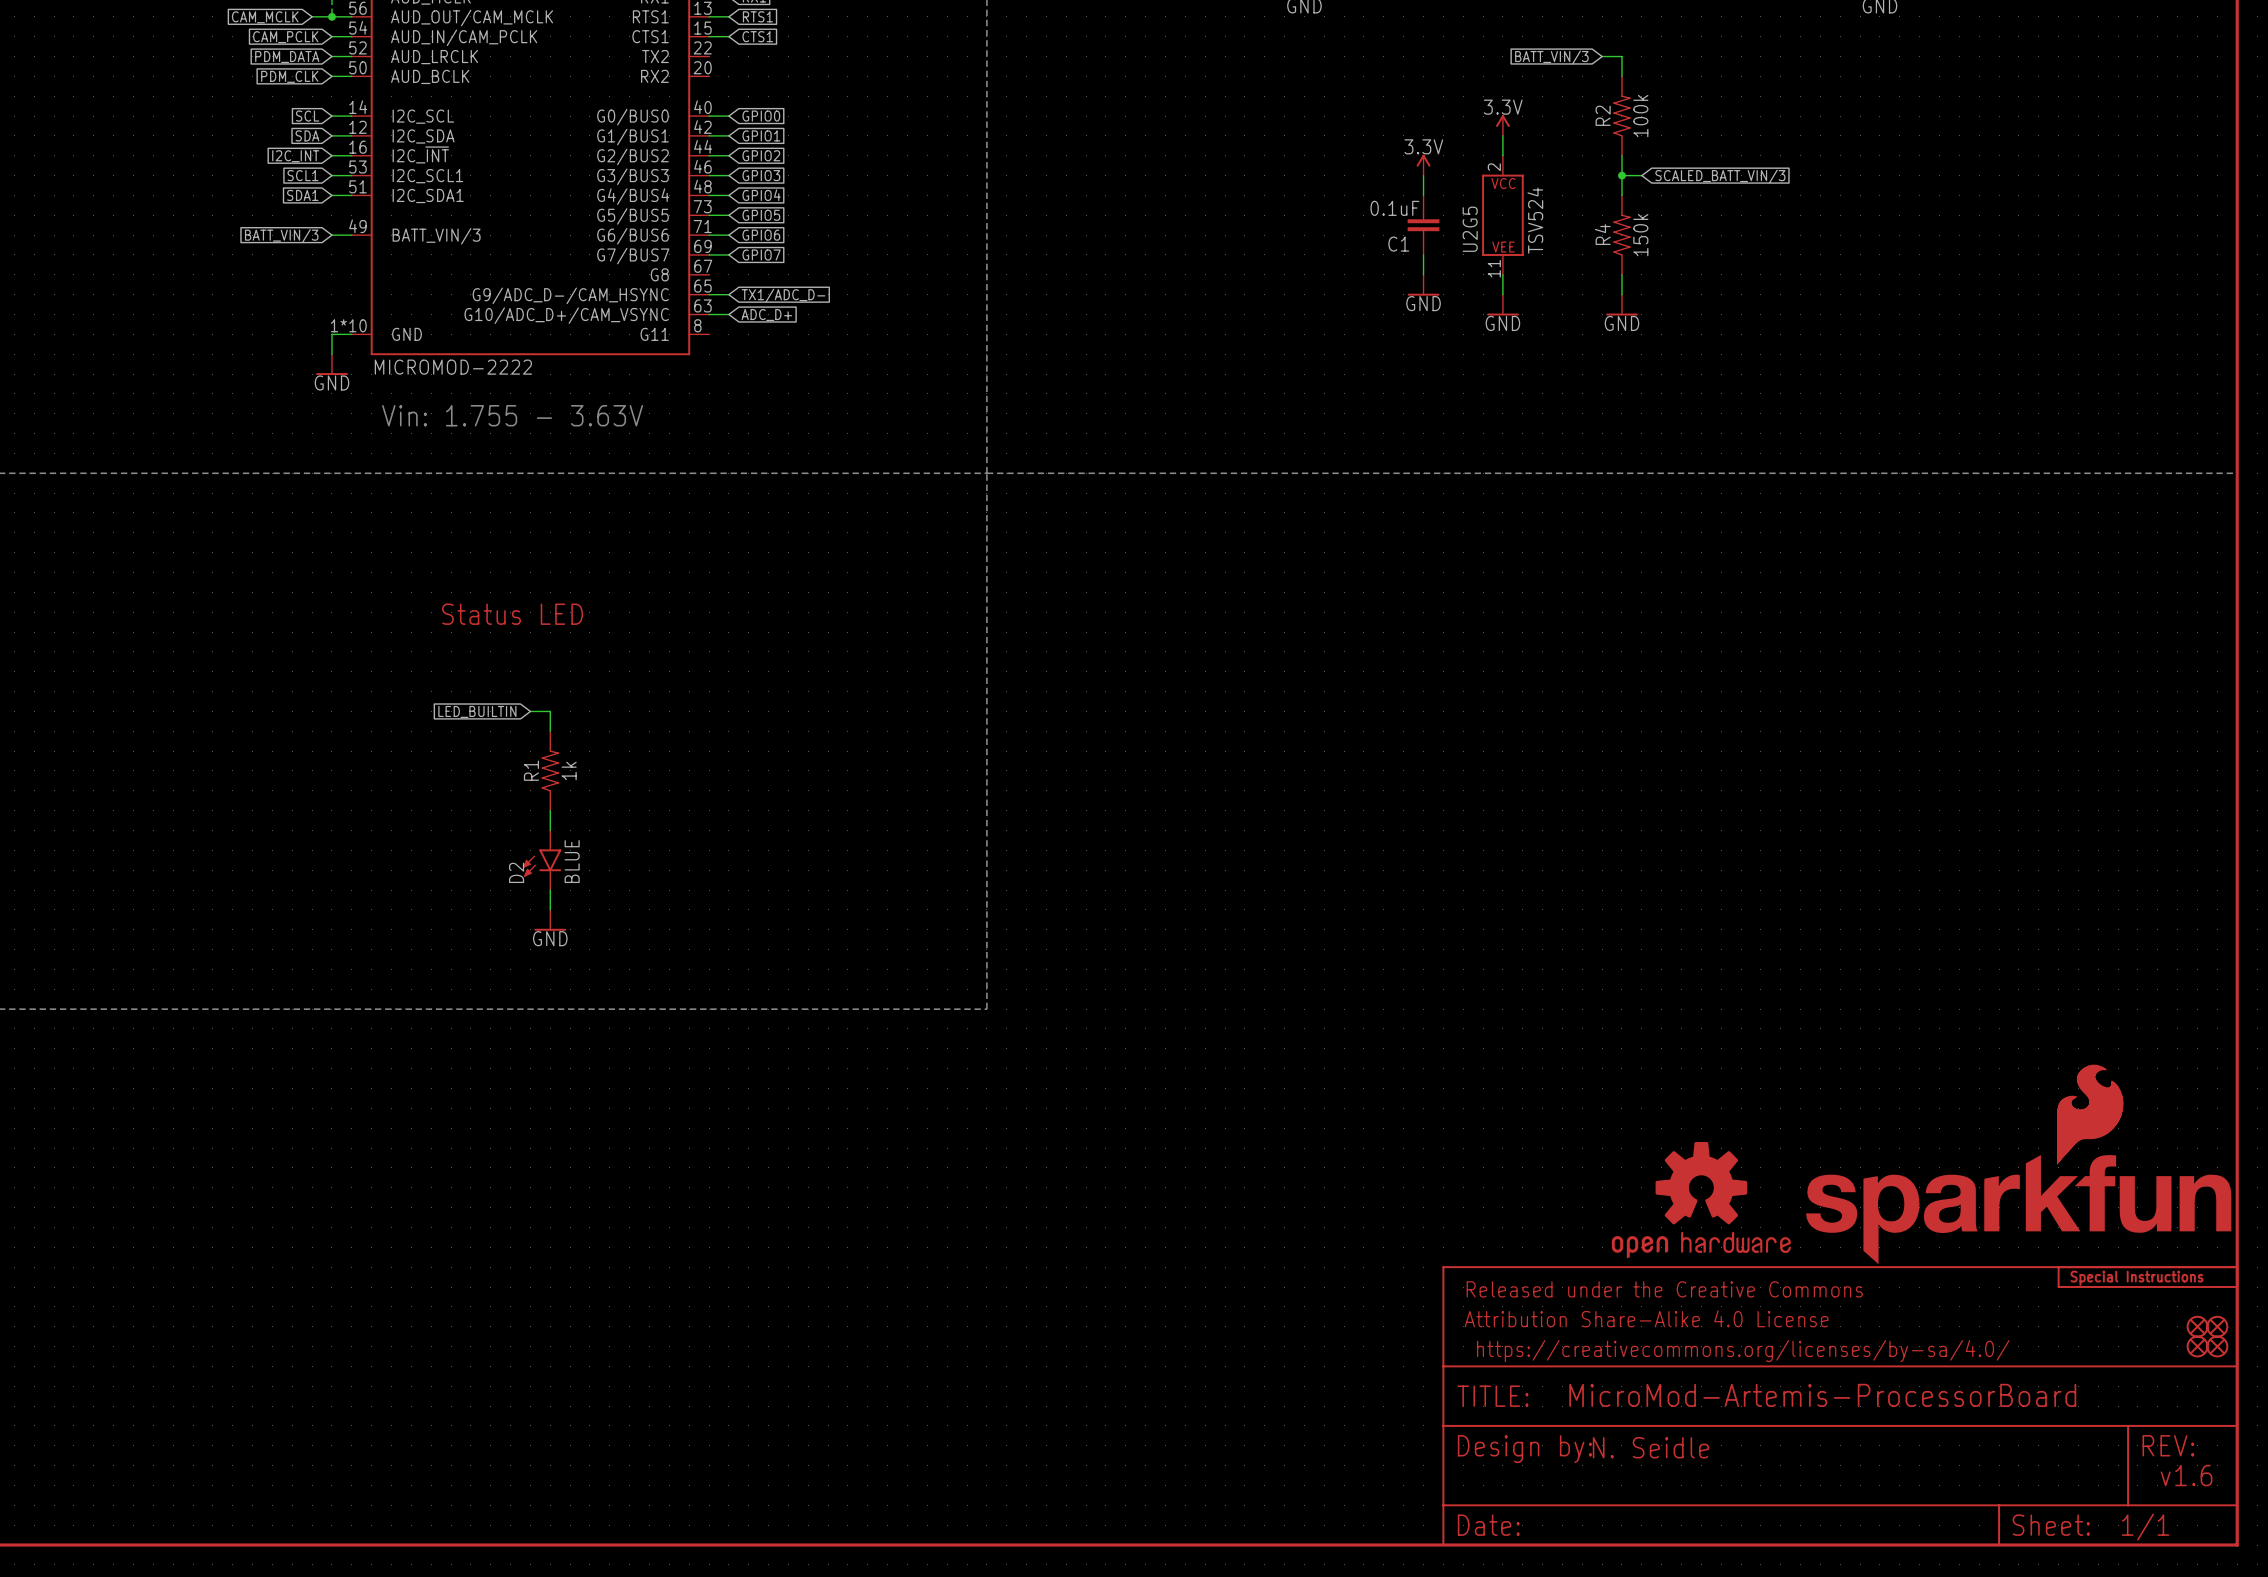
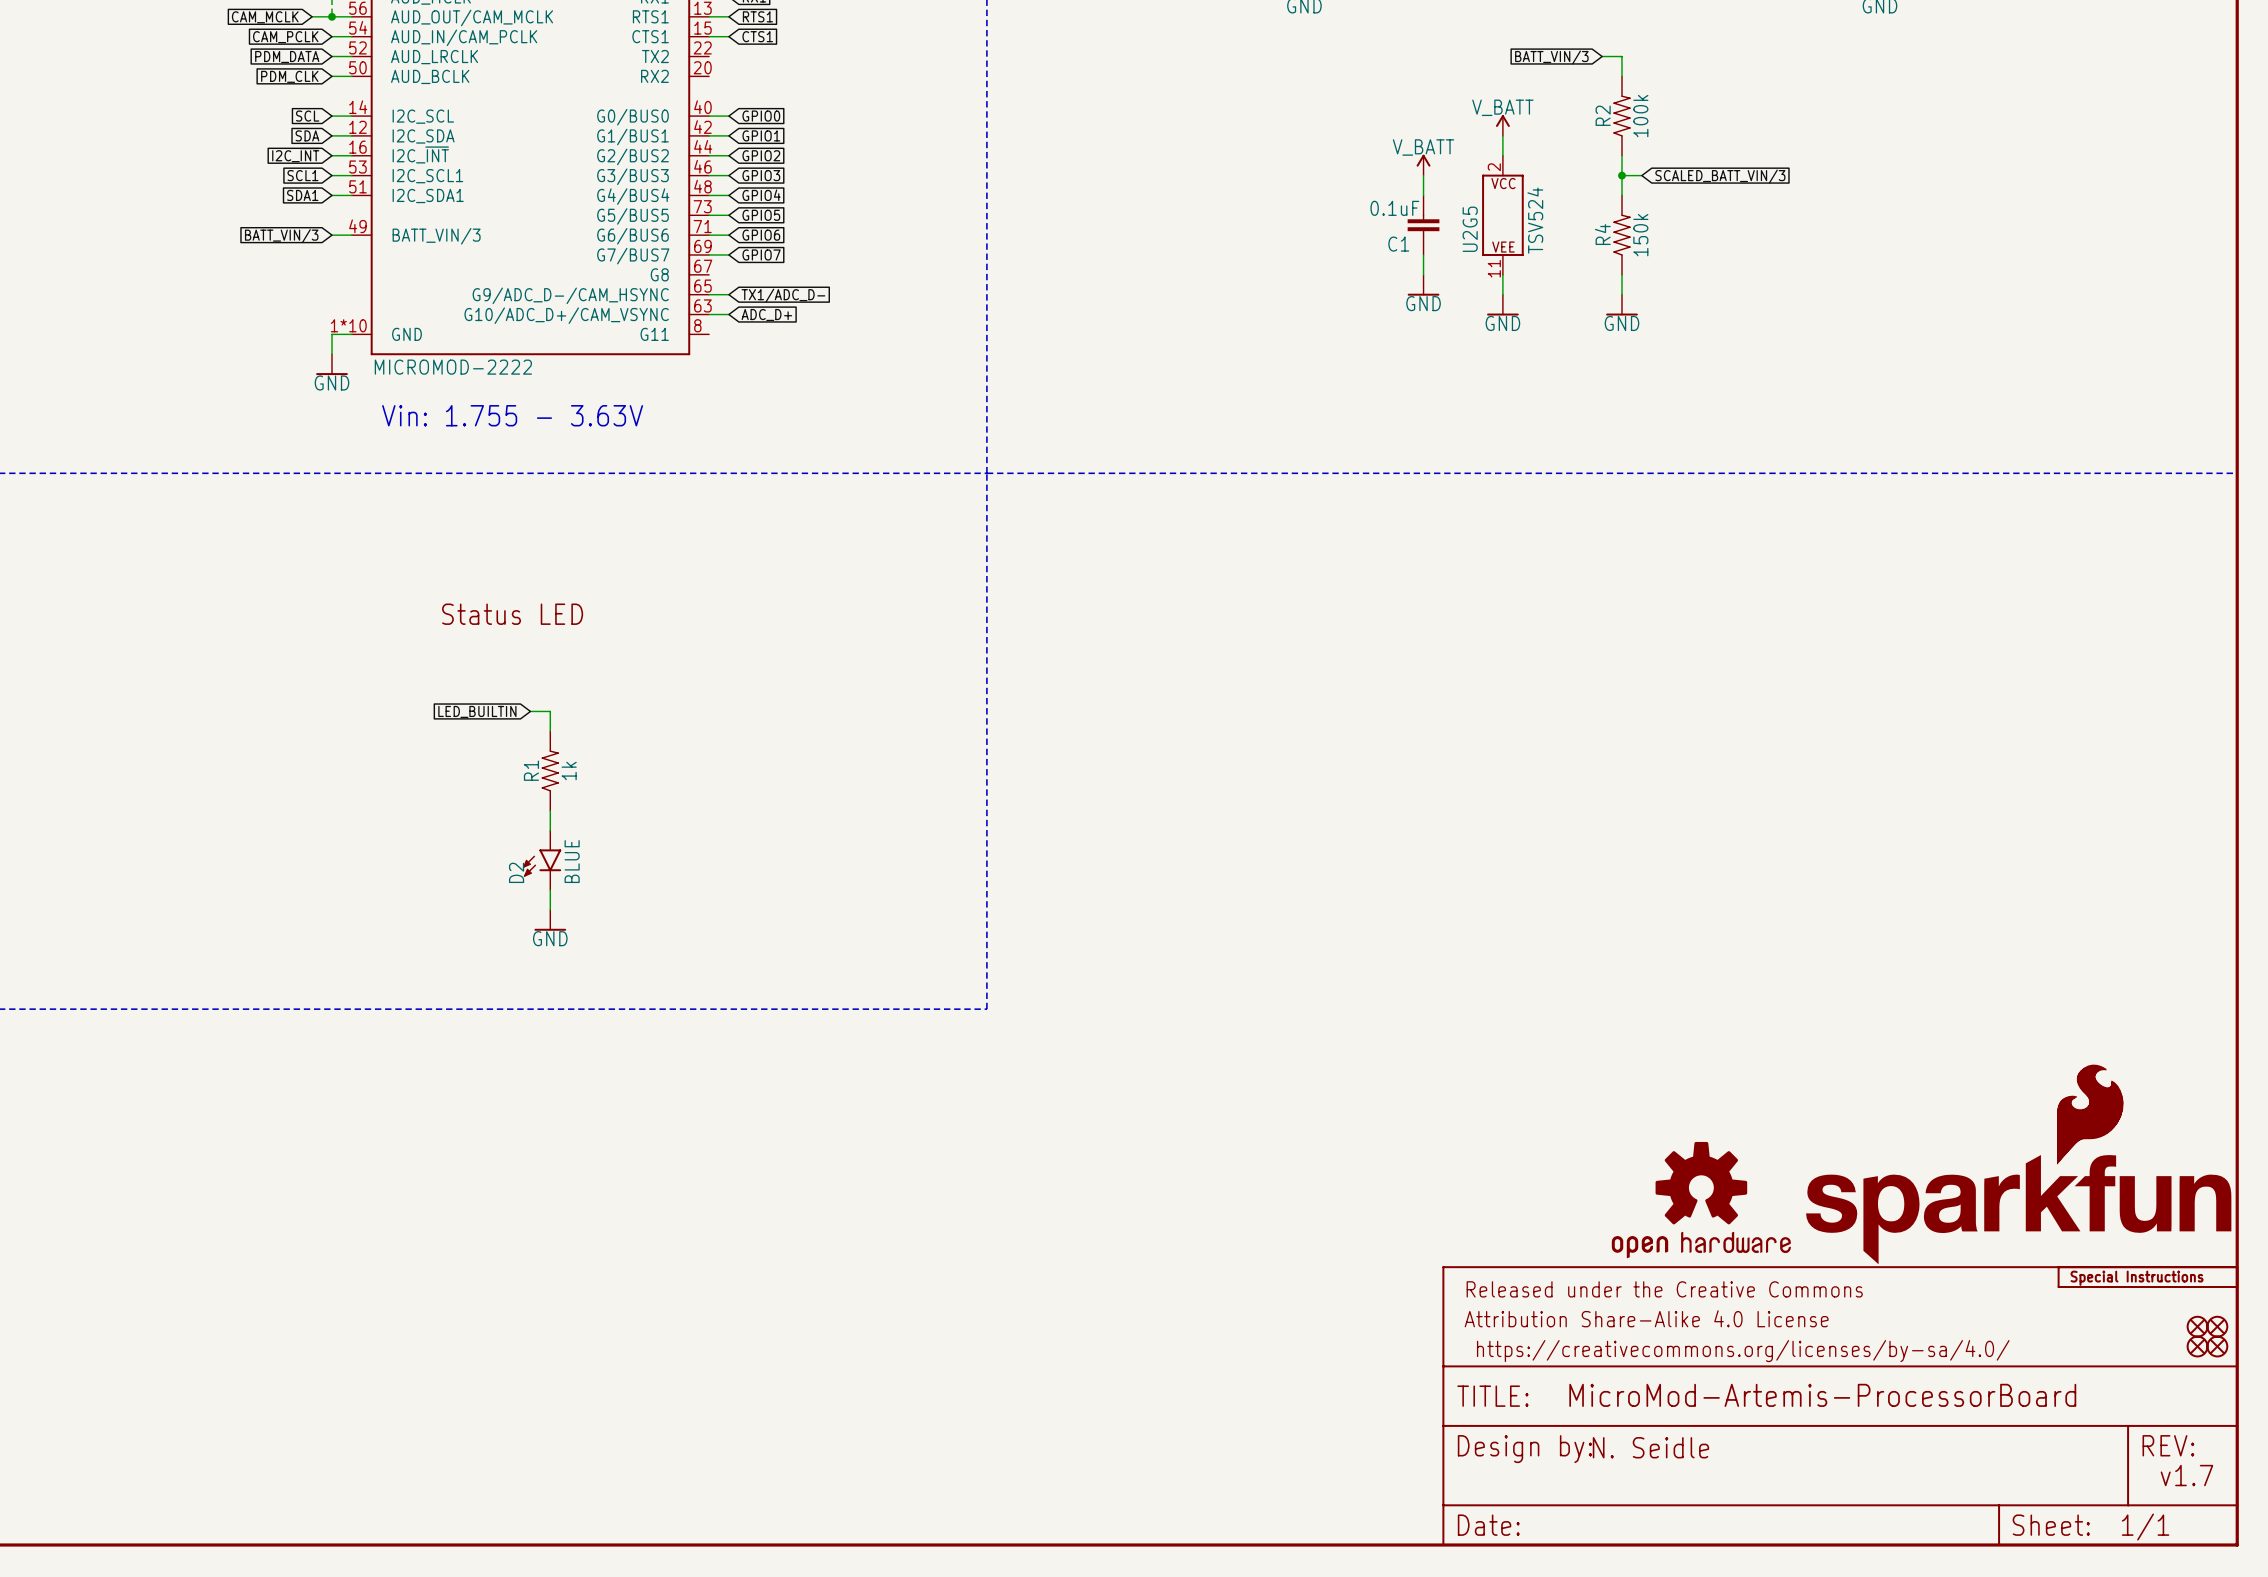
power symbol: 3.3V (1502, 125) -> V_BATT (1502, 125)
power symbol: 3.3V (1423, 165) -> V_BATT (1423, 165)
text: v1.6 (2186, 1475) -> v1.7 (2186, 1475)

